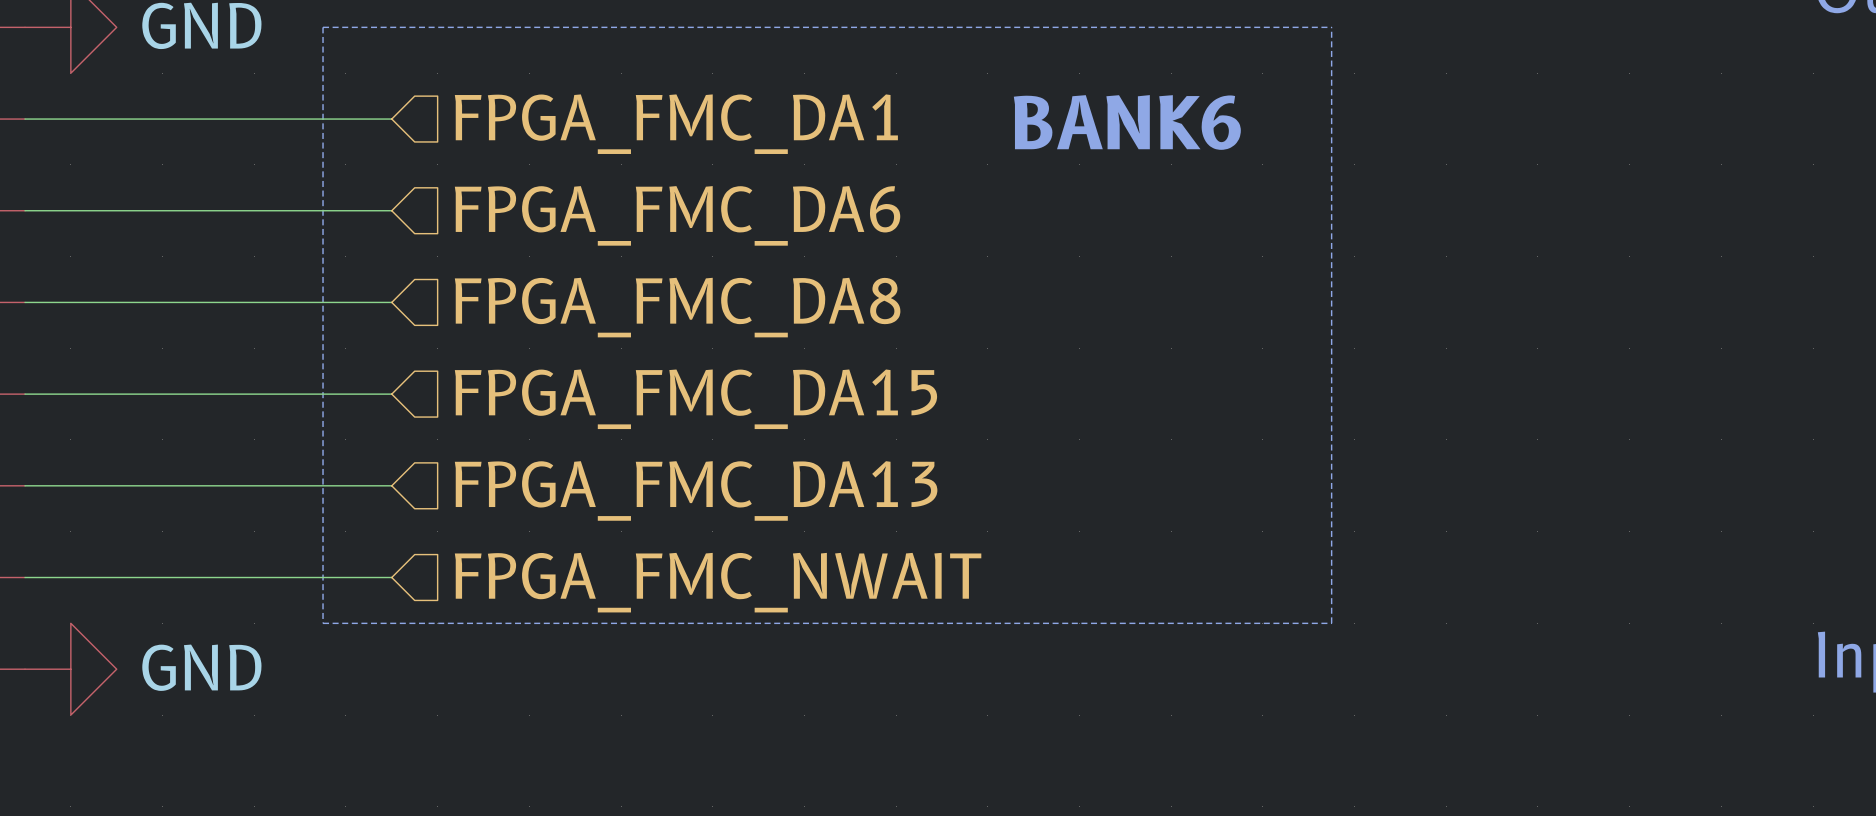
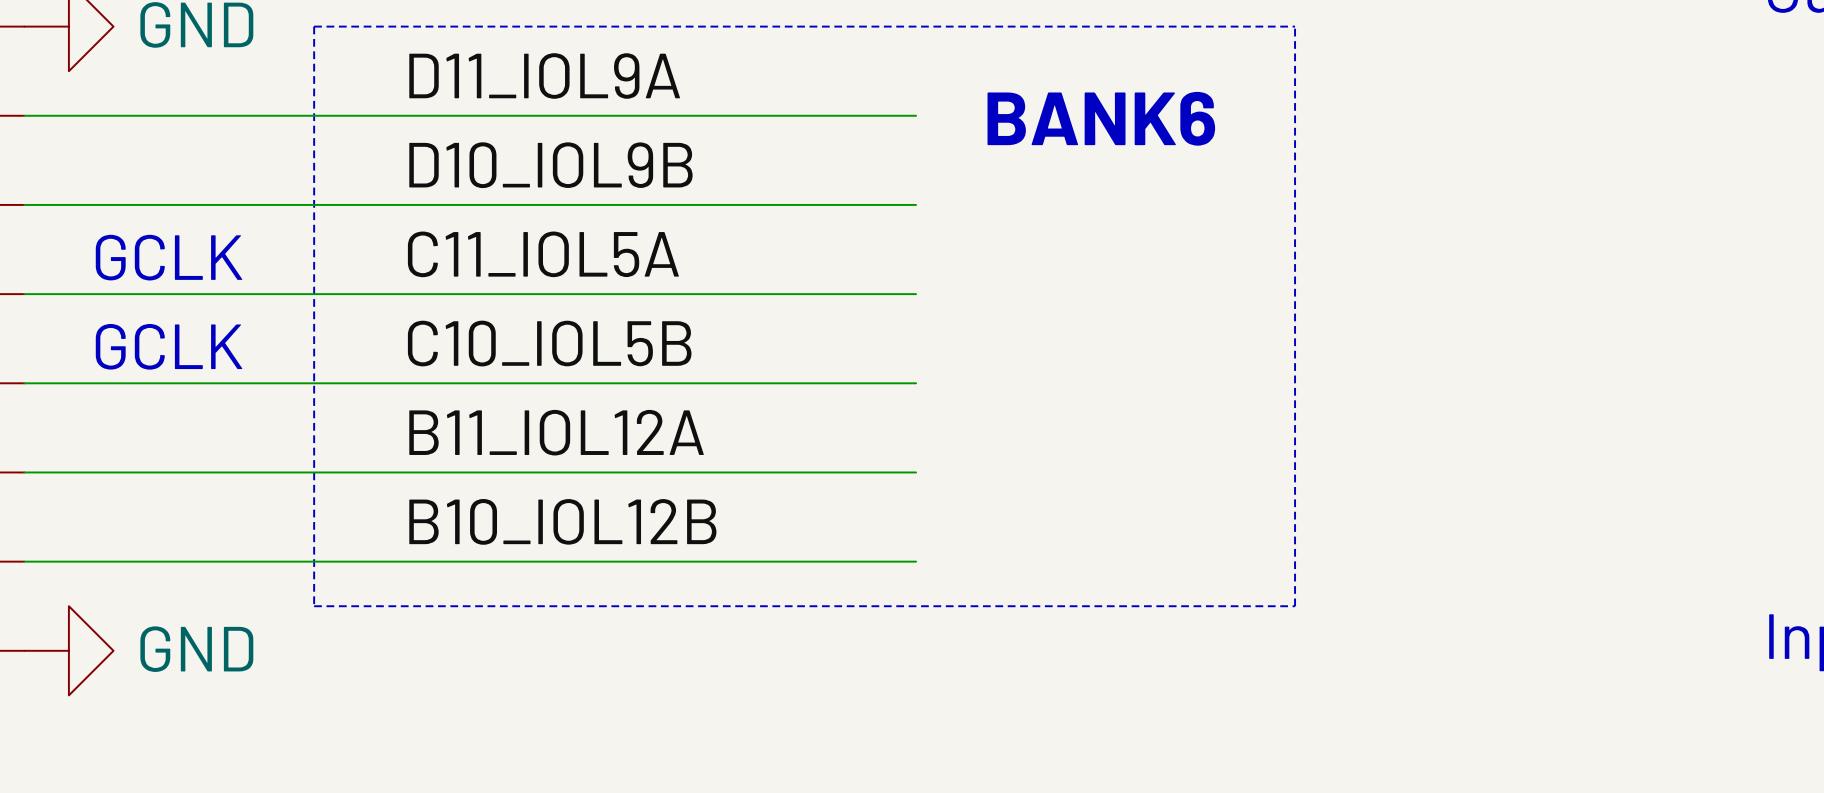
label: none -> D11_IOL9A (544, 75)
wire: none -> (381, 115) (916, 115)
hierarchical label: FPGA_FMC_DA1 (676, 124) -> none
label: none -> D10_IOL9B (550, 165)
wire: none -> (381, 204) (916, 204)
hierarchical label: FPGA_FMC_DA6 (677, 215) -> none
text: none -> GCLK (169, 257)
label: none -> C11_IOL5A (543, 254)
wire: none -> (381, 294) (916, 294)
hierarchical label: FPGA_FMC_DA8 (677, 307) -> none
text: none -> GCLK (169, 346)
label: none -> C10_IOL5B (549, 343)
wire: none -> (381, 383) (916, 383)
hierarchical label: FPGA_FMC_DA15 (695, 399) -> none
label: none -> B11_IOL12A (556, 432)
wire: none -> (381, 472) (916, 472)
hierarchical label: FPGA_FMC_DA13 (696, 490) -> none
label: none -> B10_IOL12B (562, 521)
wire: none -> (381, 561) (916, 561)
hierarchical label: FPGA_FMC_NWAIT (718, 582) -> none

